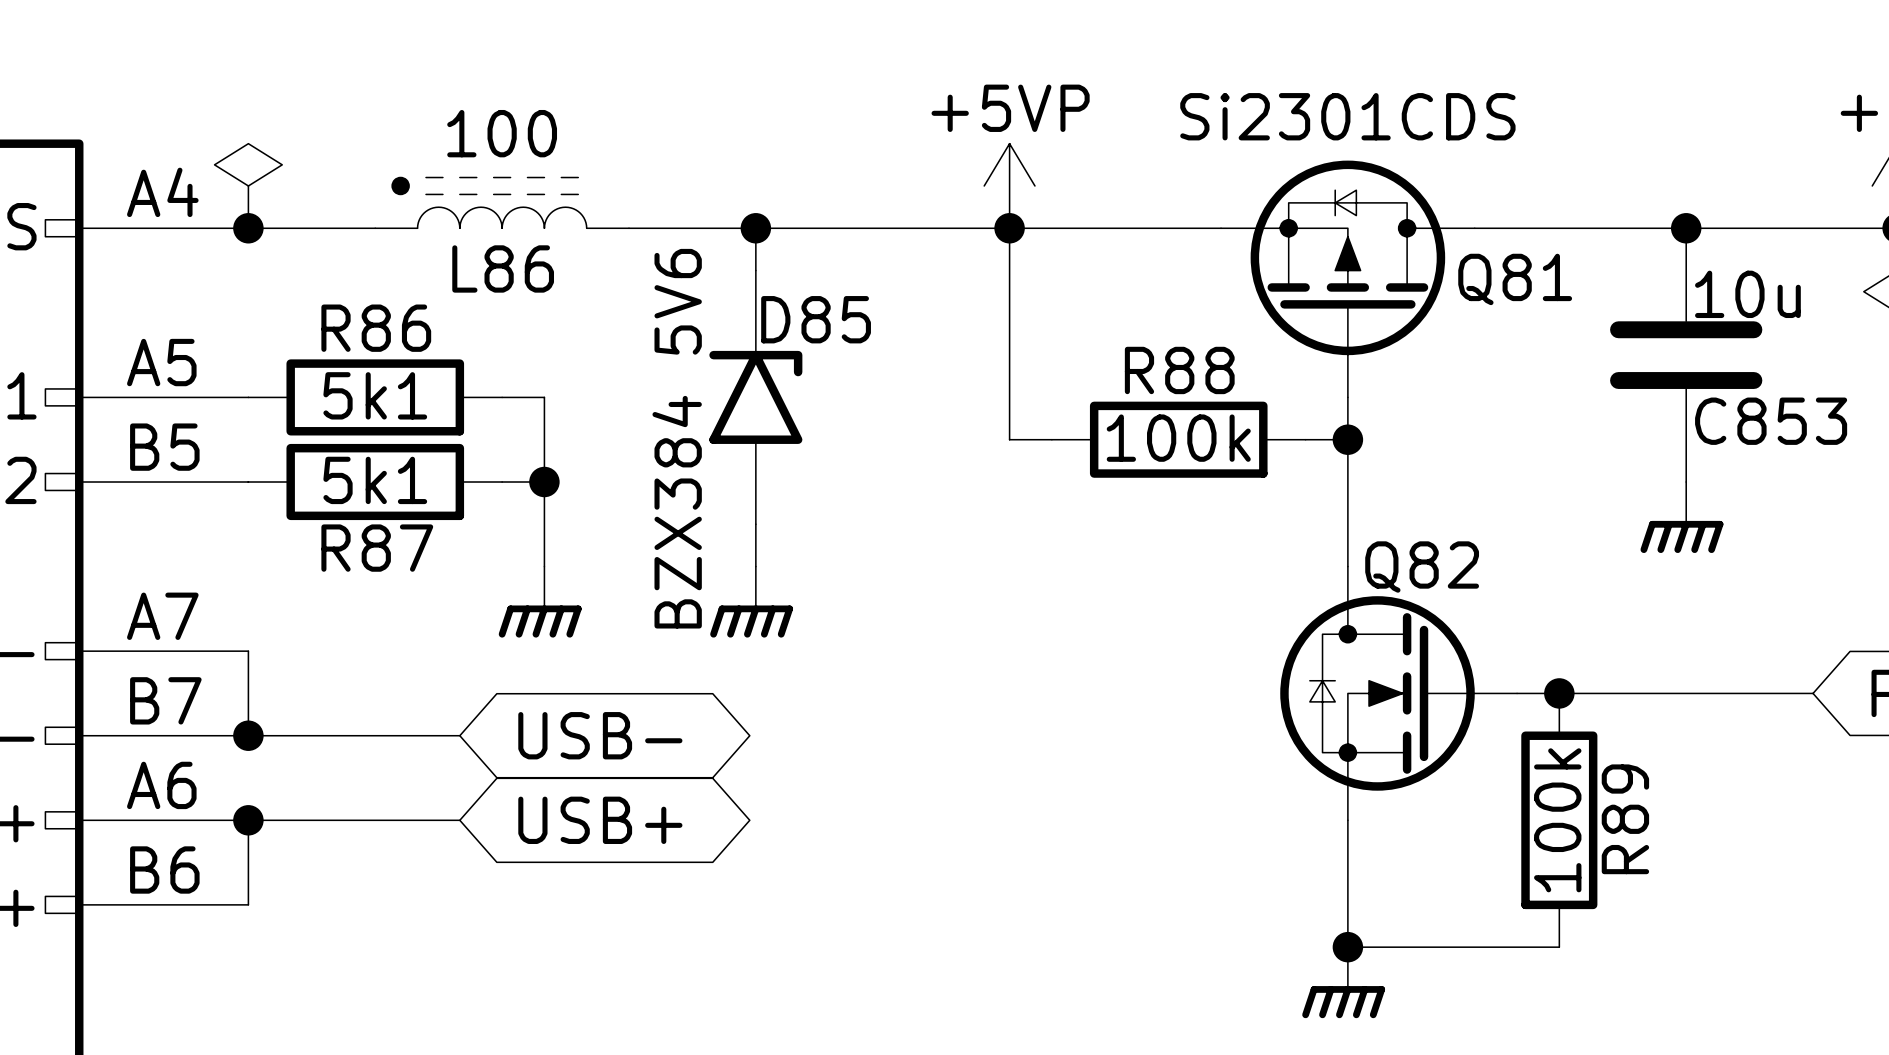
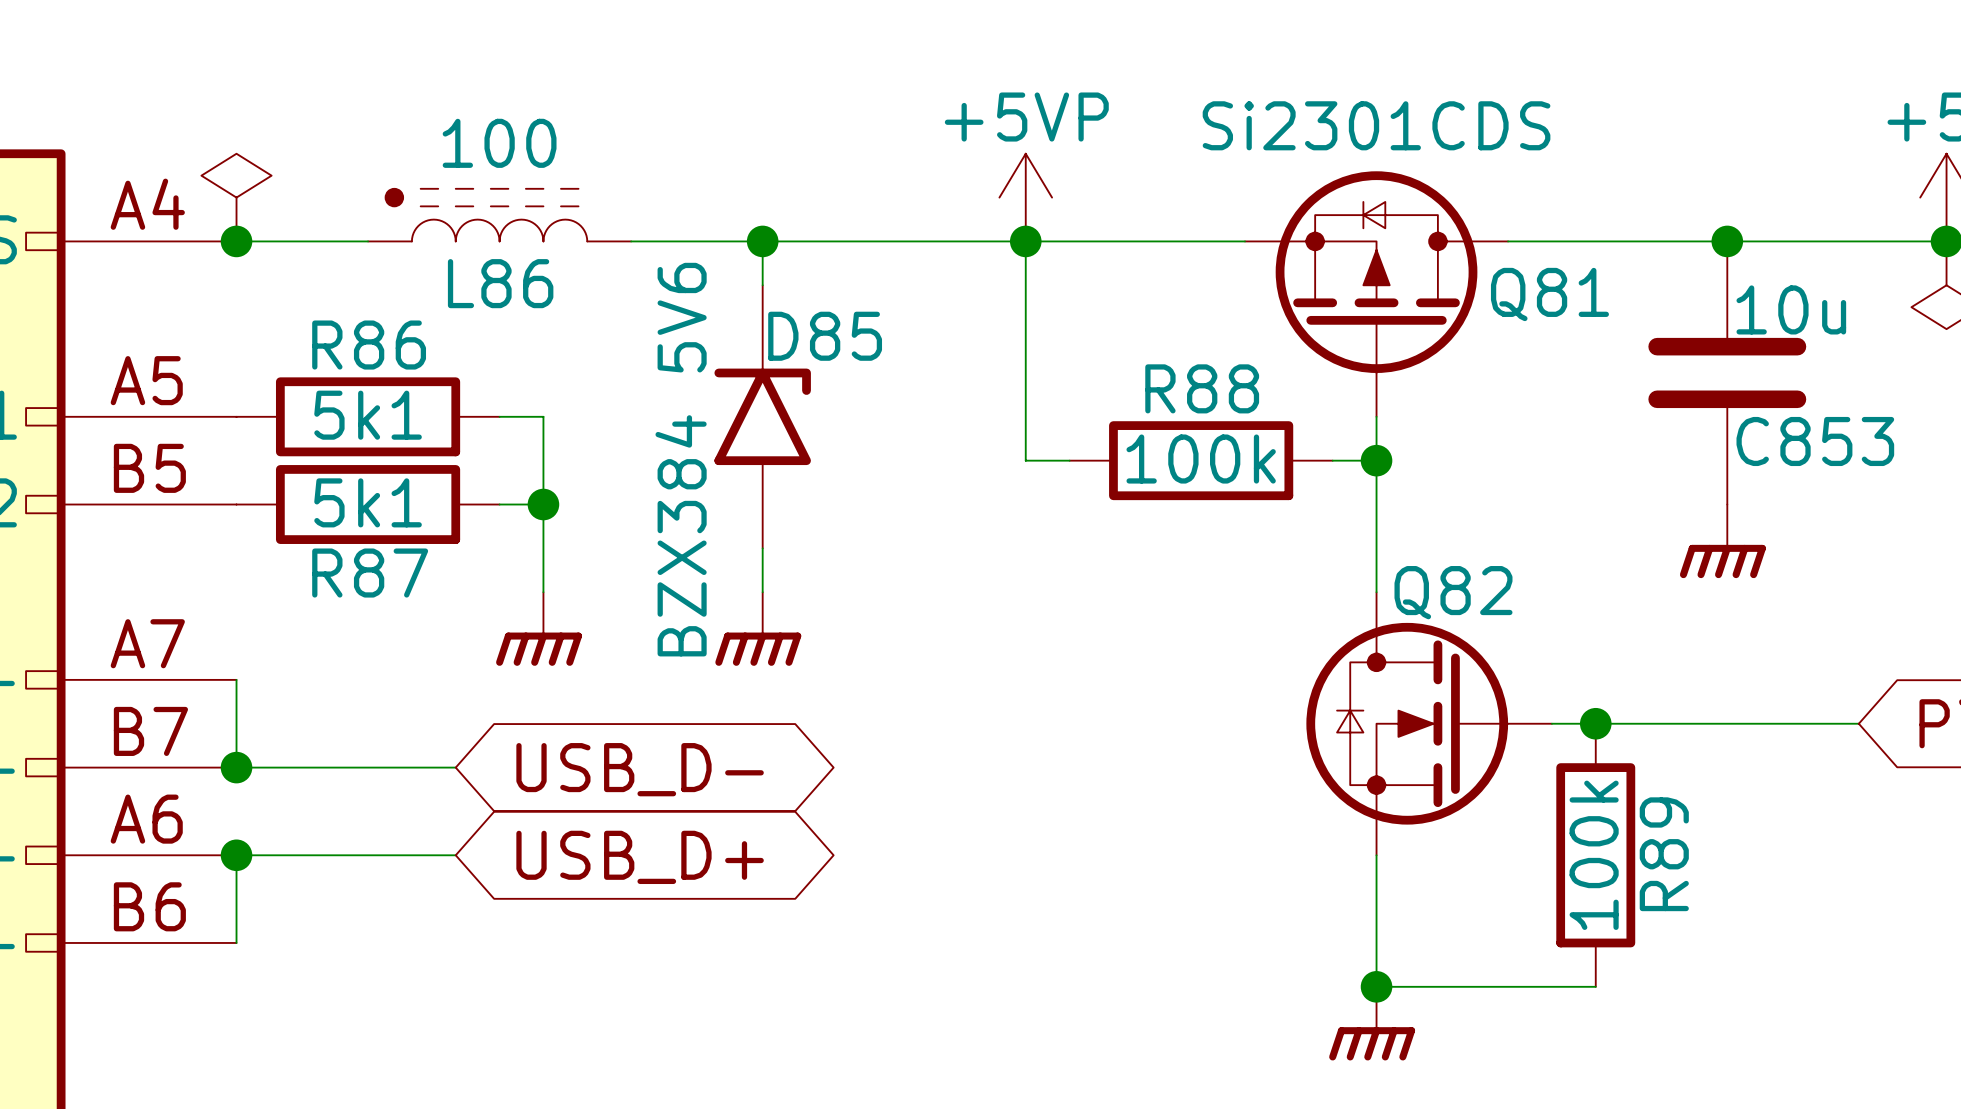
global label: USB- (600, 735) -> USB_D- (640, 769)
global label: USB+ (600, 820) -> USB_D+ (640, 857)

